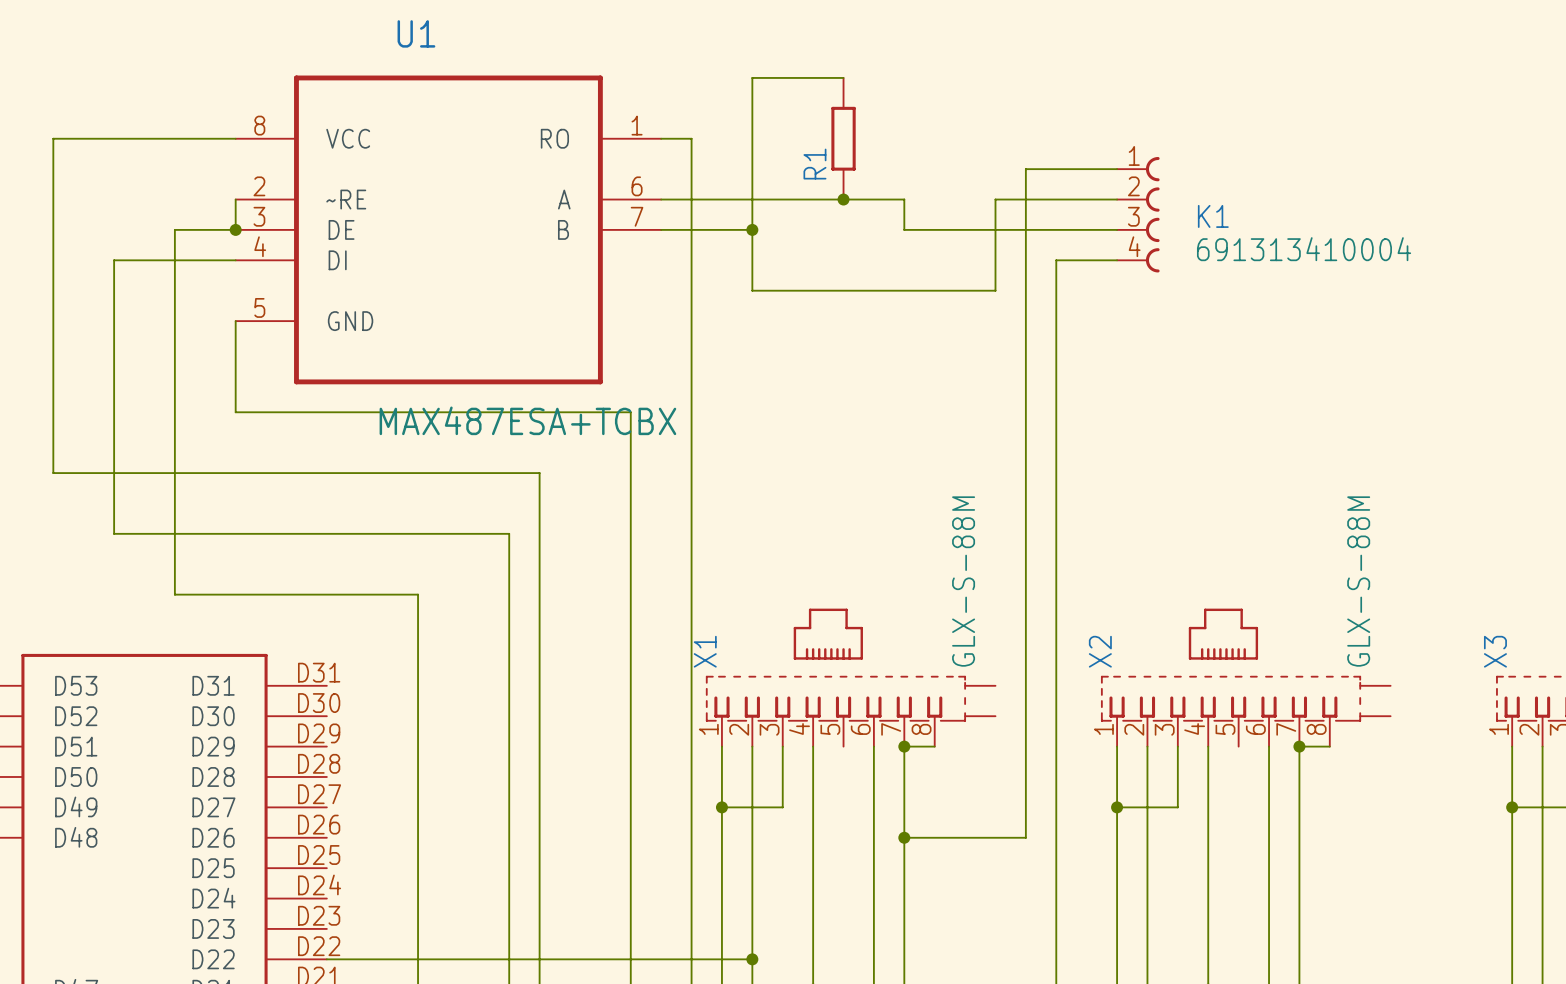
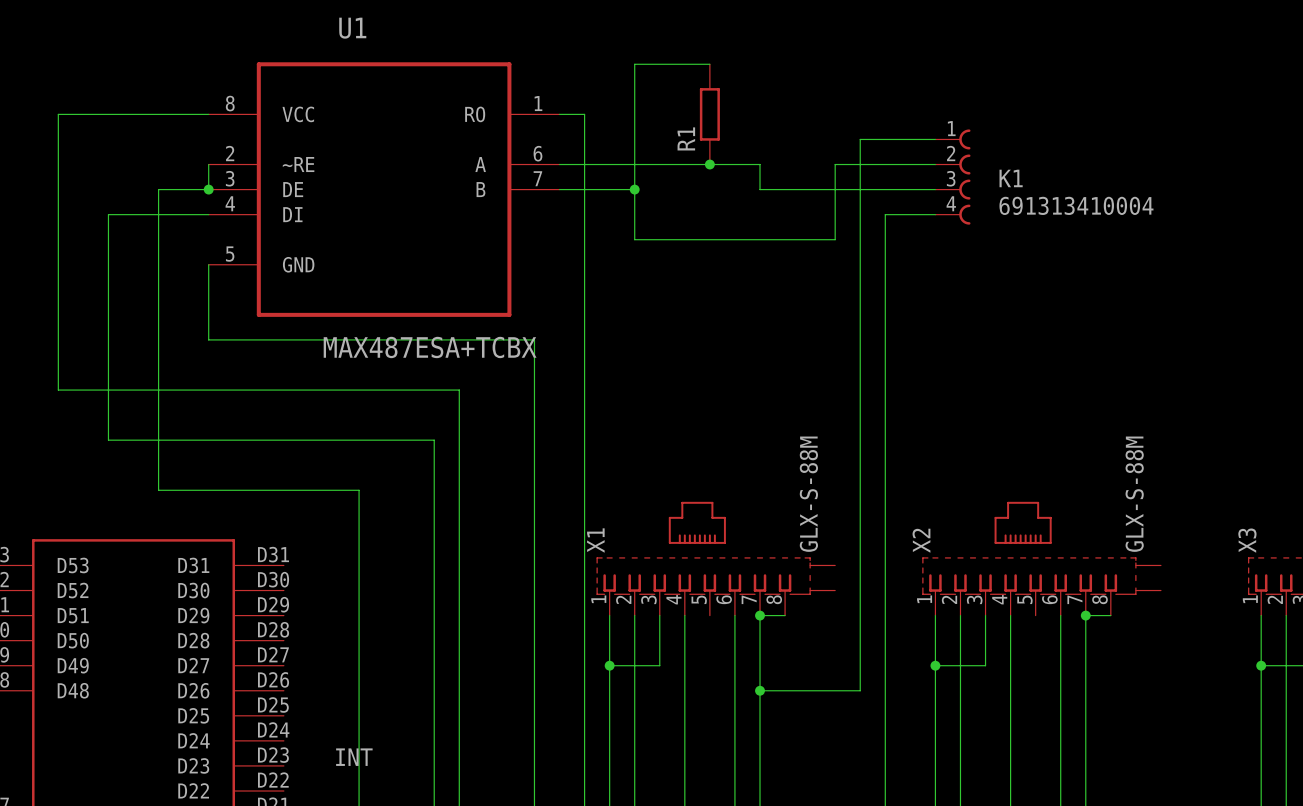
label: none -> INT (354, 757)
wire: (326, 959) (752, 959) -> none
junction: (752, 959) -> none

